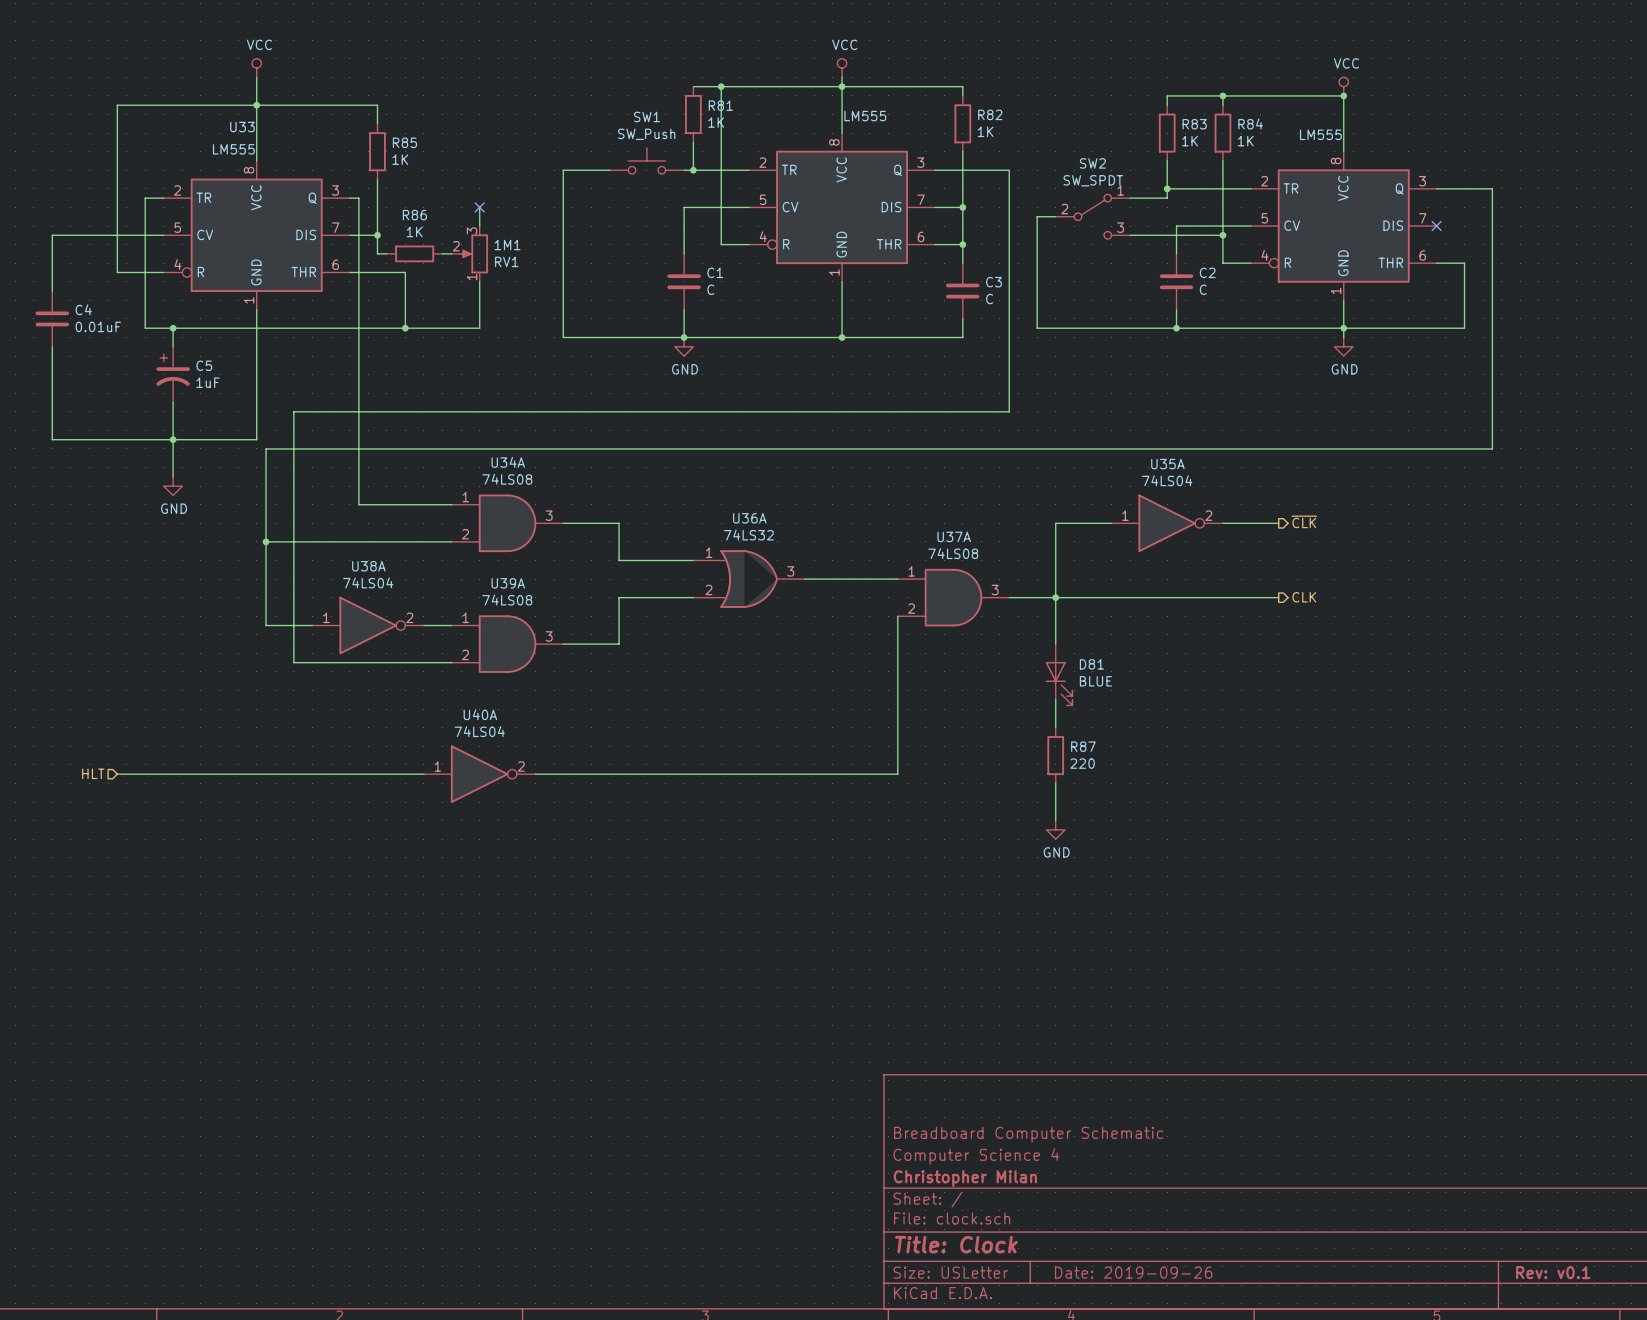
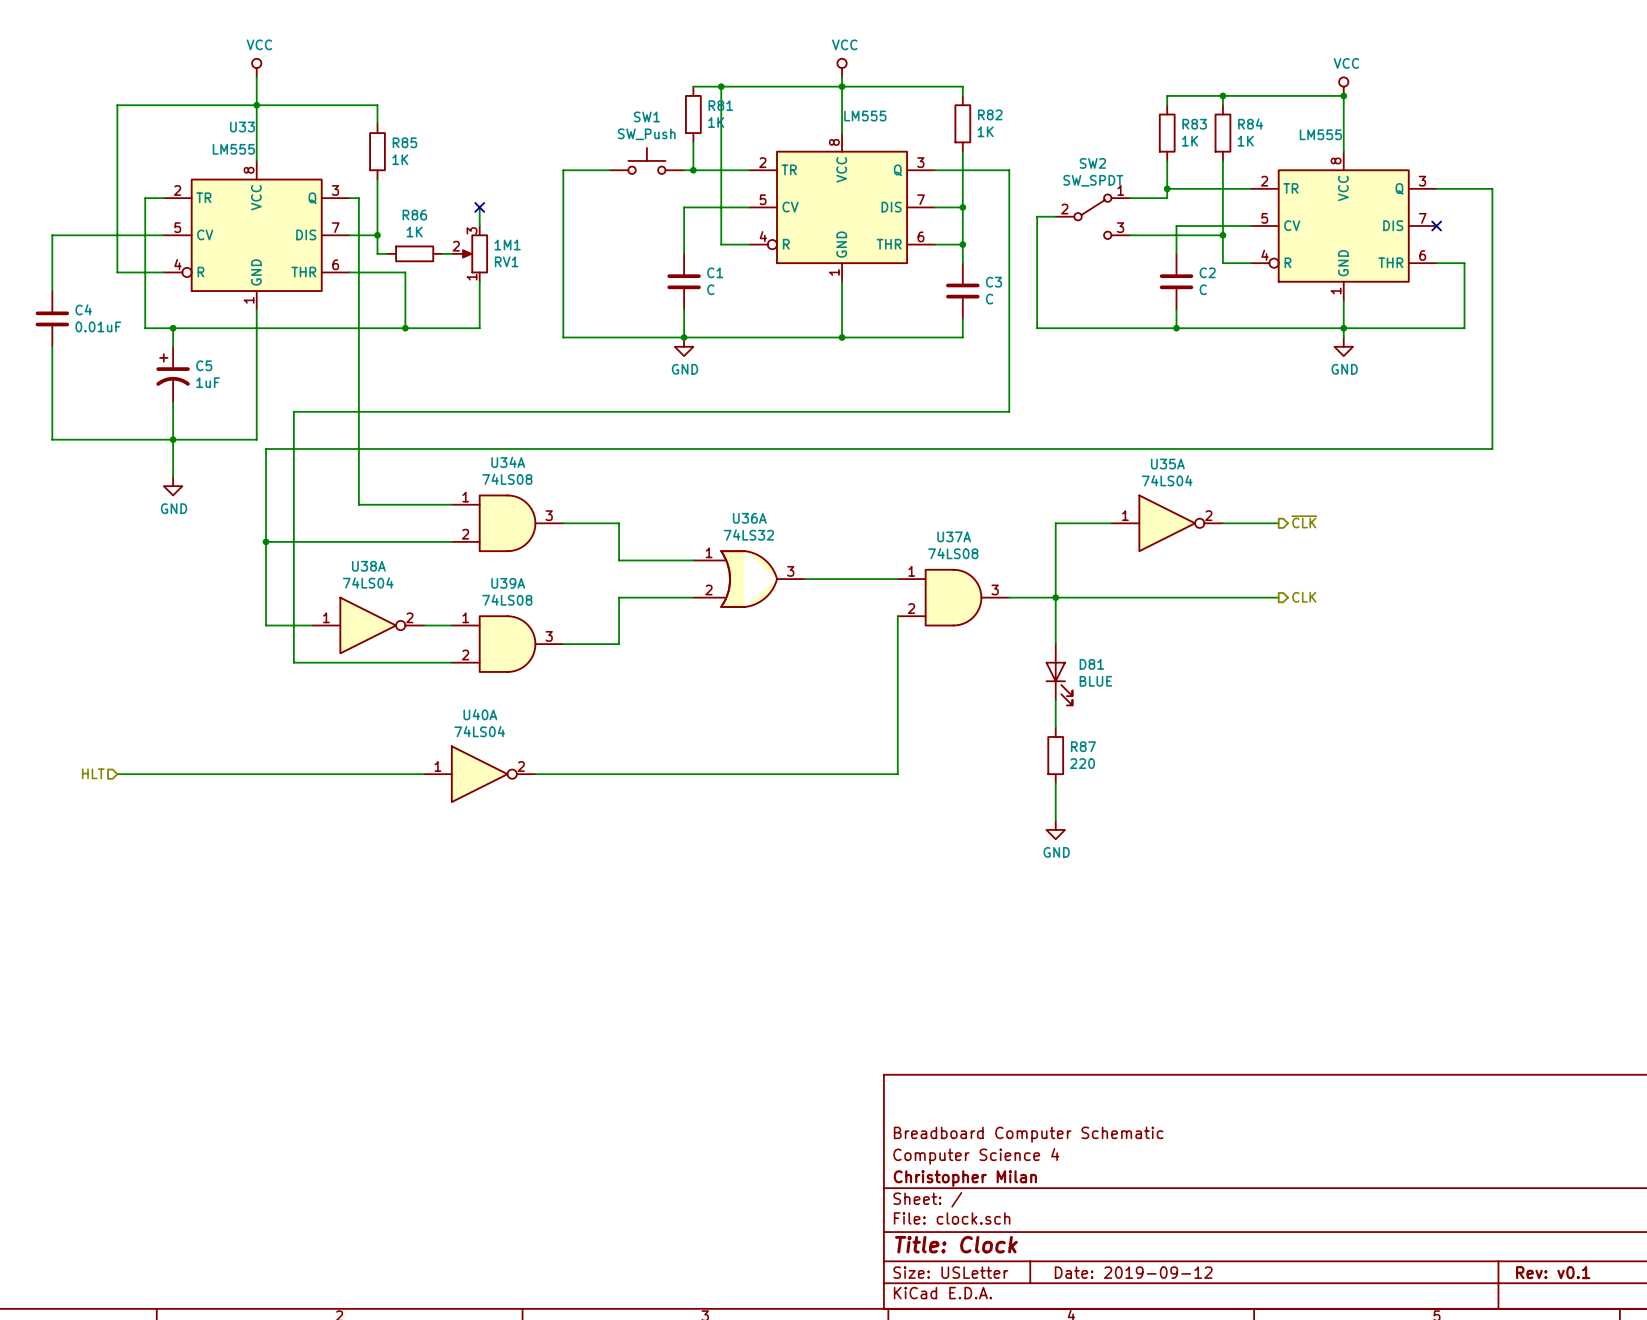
title block: Date: 2019-09-26 (1133, 1272) -> Date: 2019-09-12 (1133, 1272)

